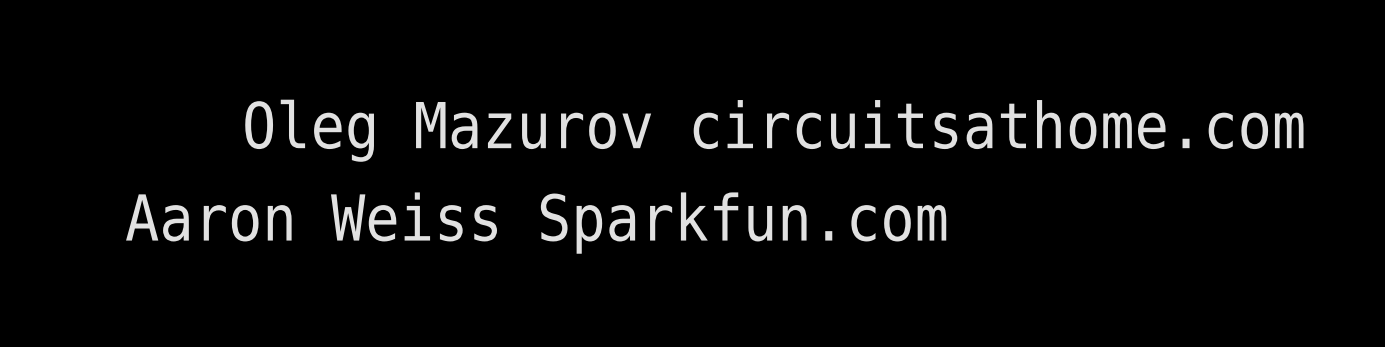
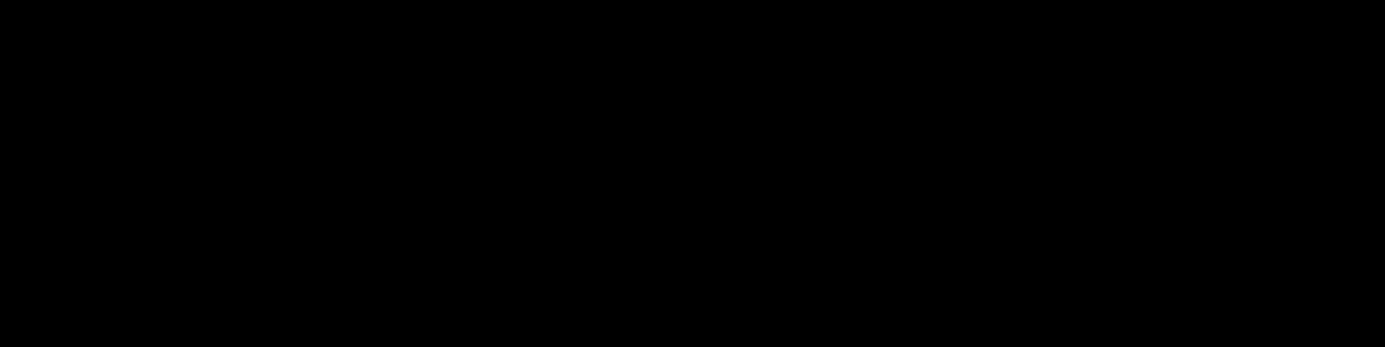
text: Oleg Mazurov circuitsathome.com (774, 130) -> none
text: Aaron Weiss Sparkfun.com (536, 223) -> none

